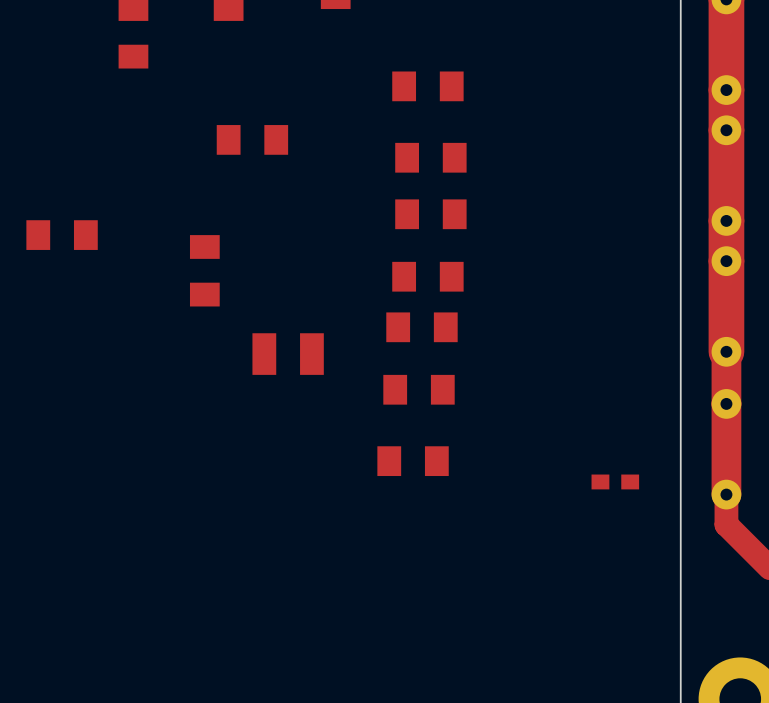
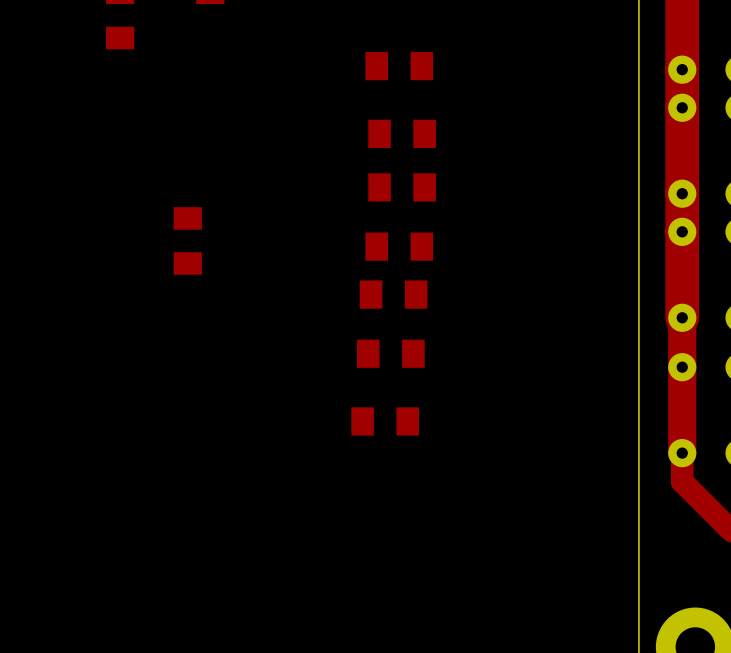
part: (252, 139) -> none
part: (62, 235) -> none
part: (288, 354) -> none
part: (615, 481) -> none

